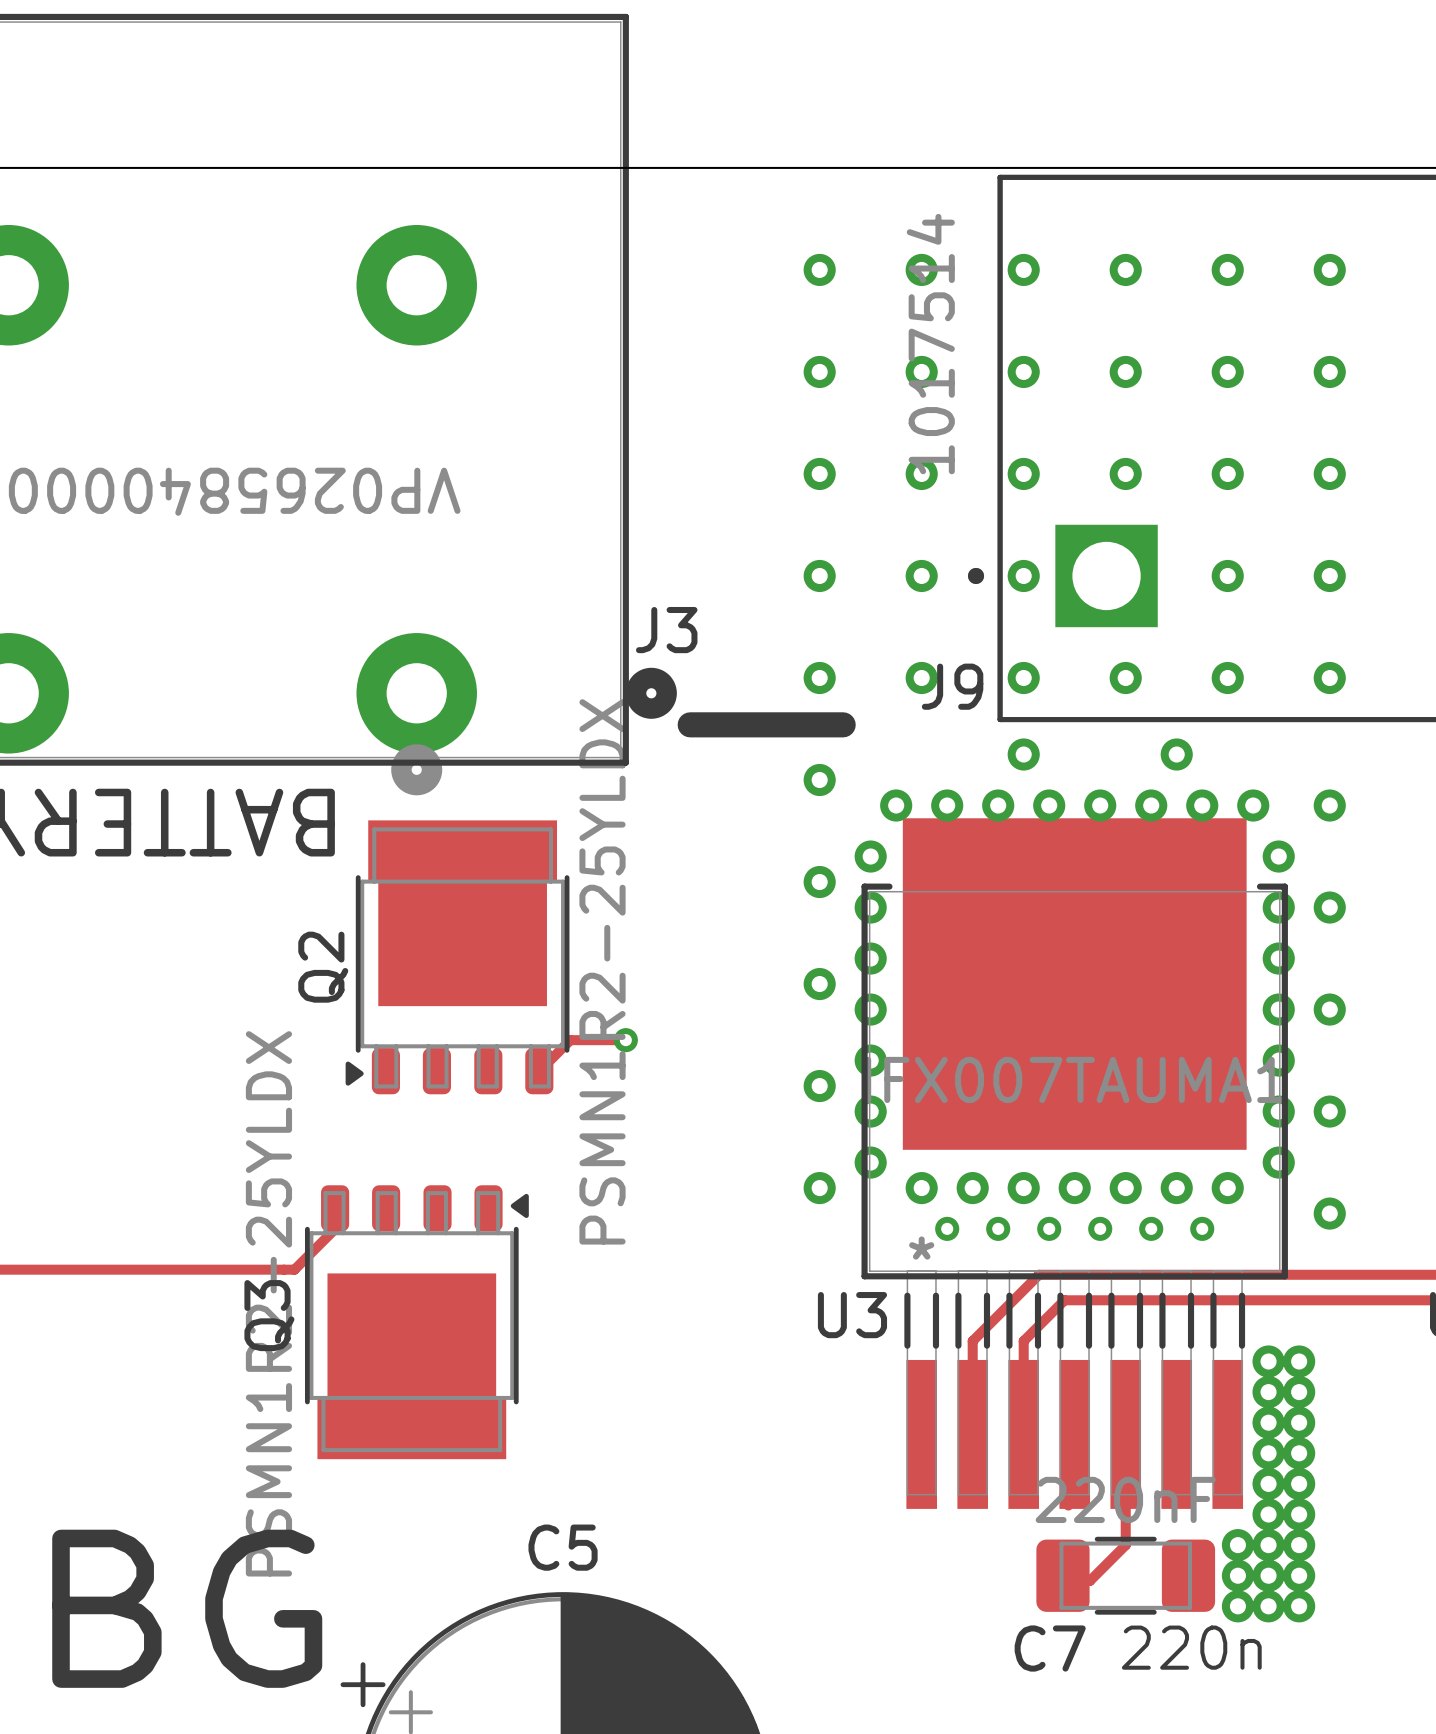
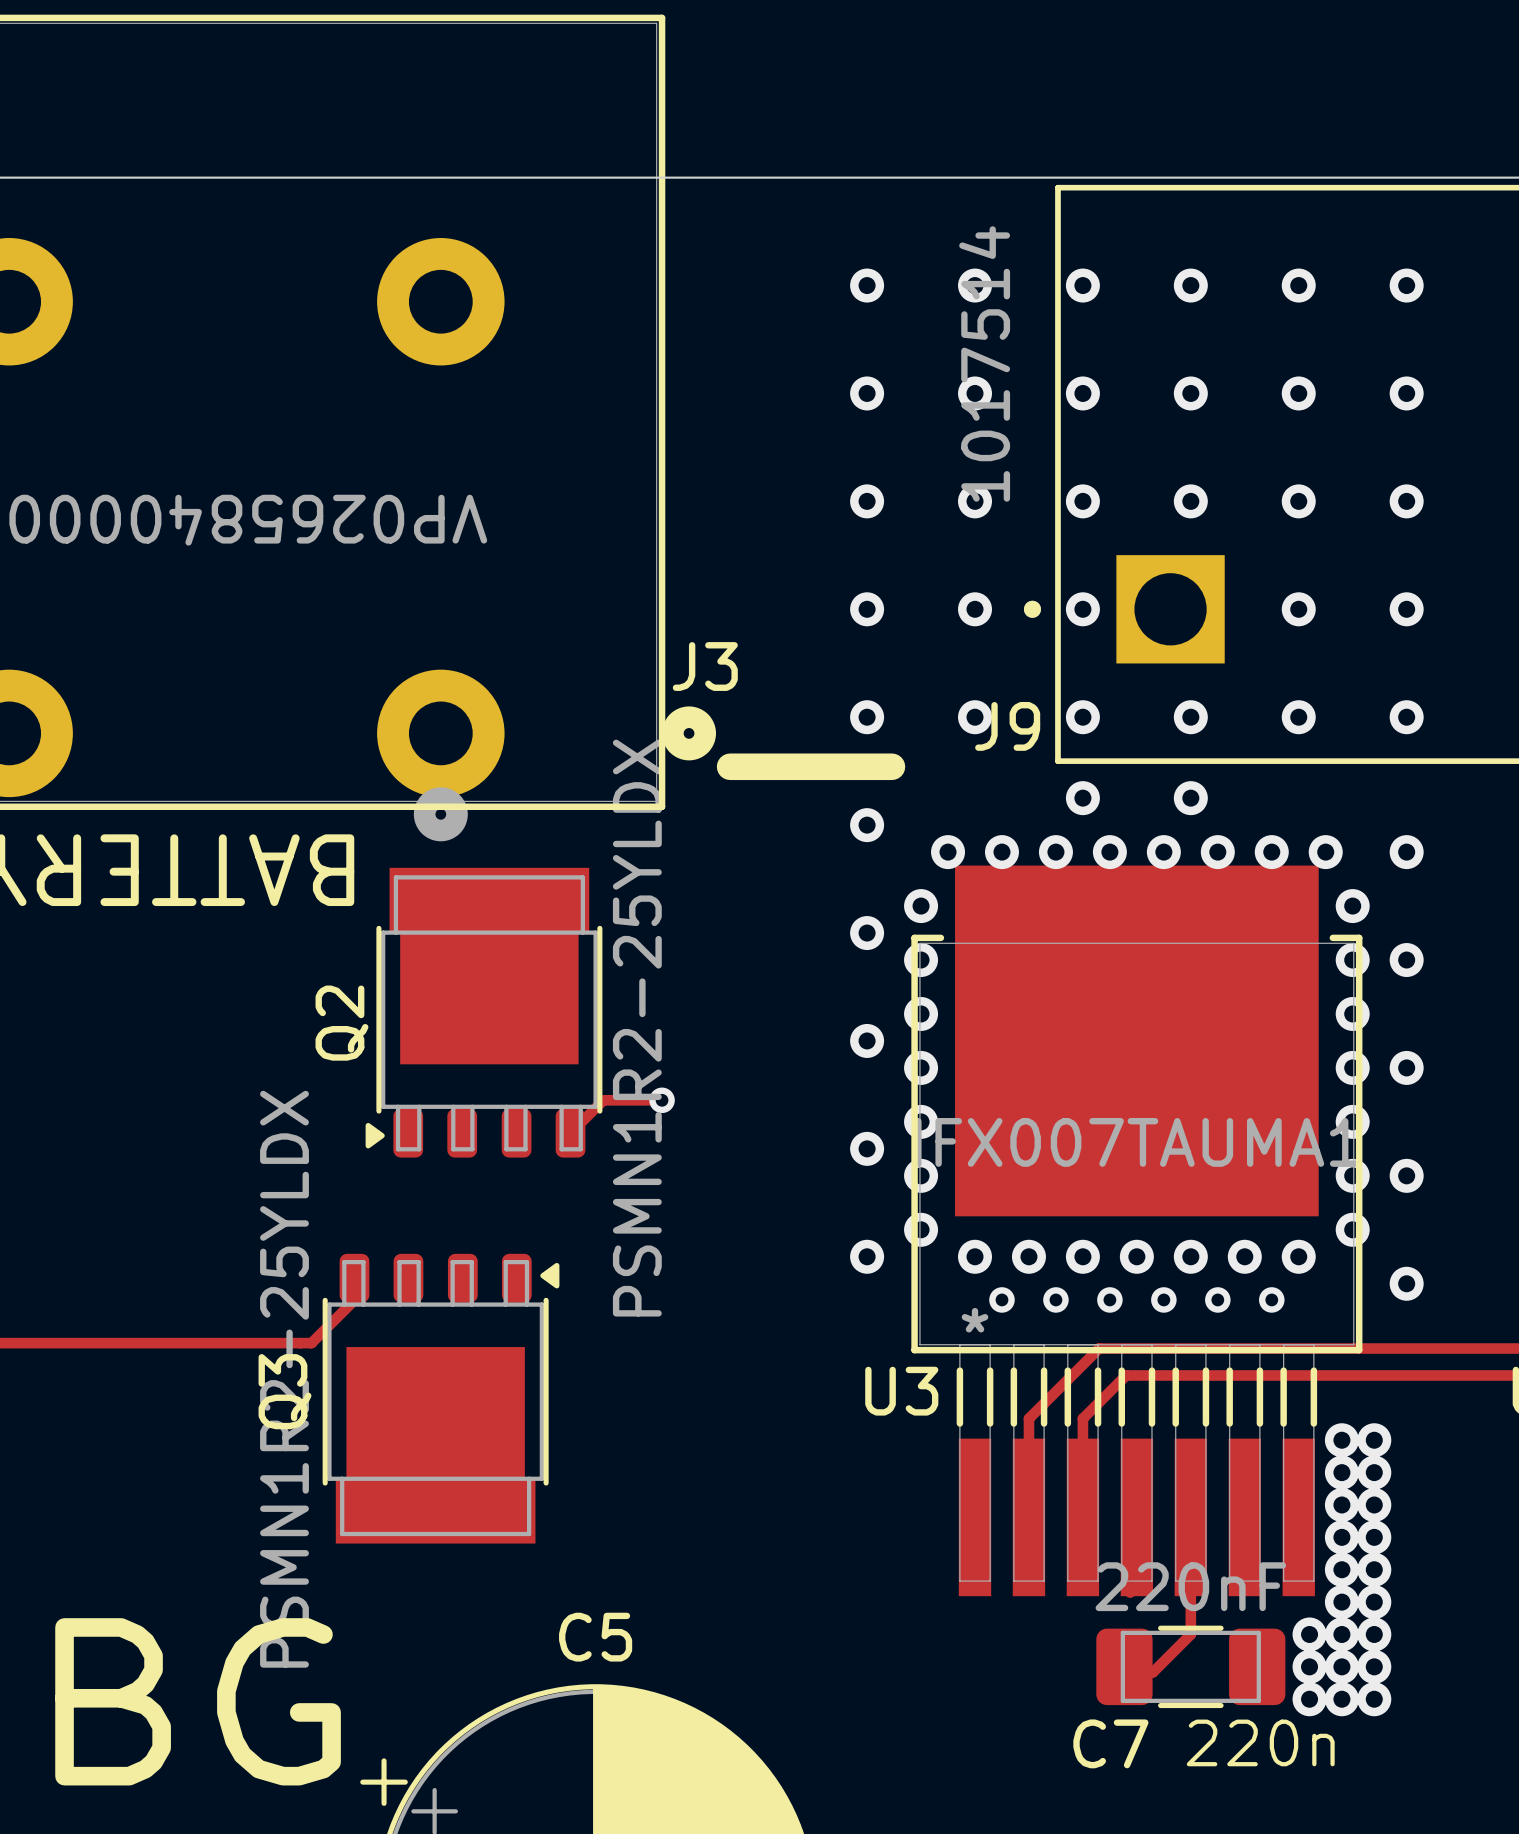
via position: (1176, 754) -> (1190, 798)

